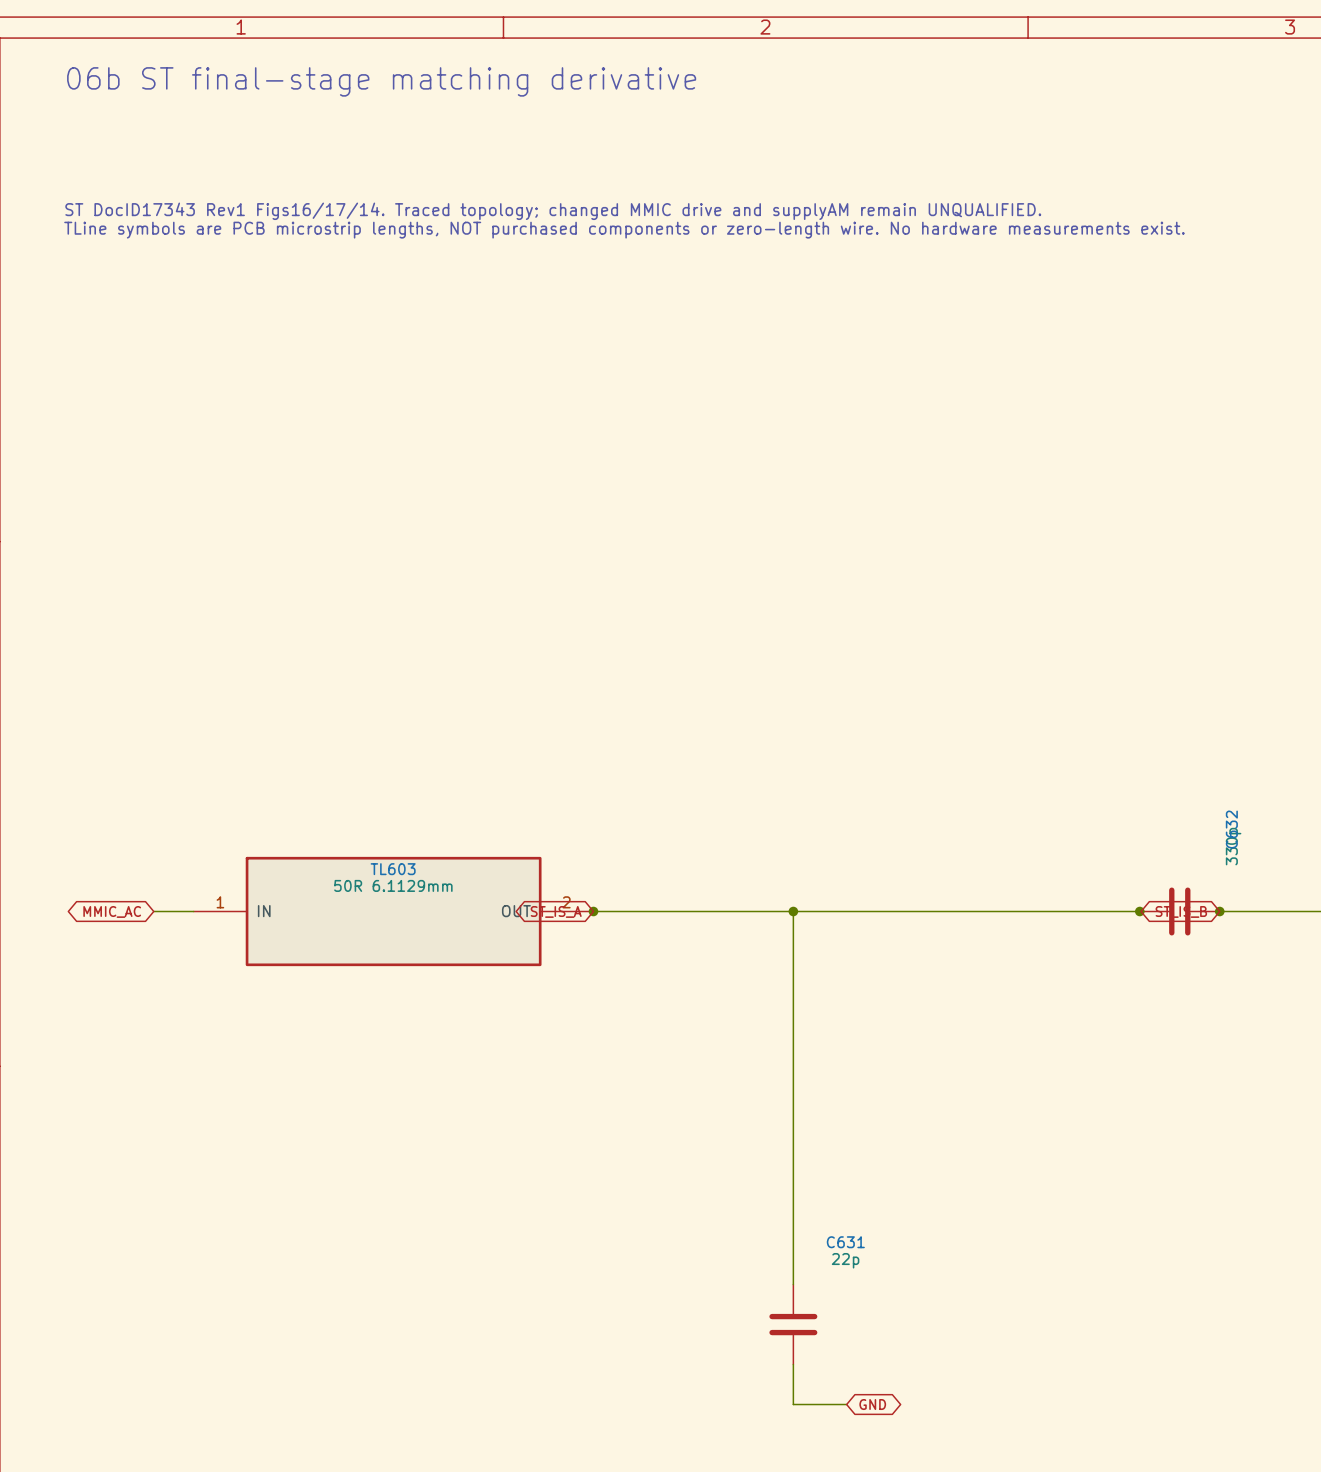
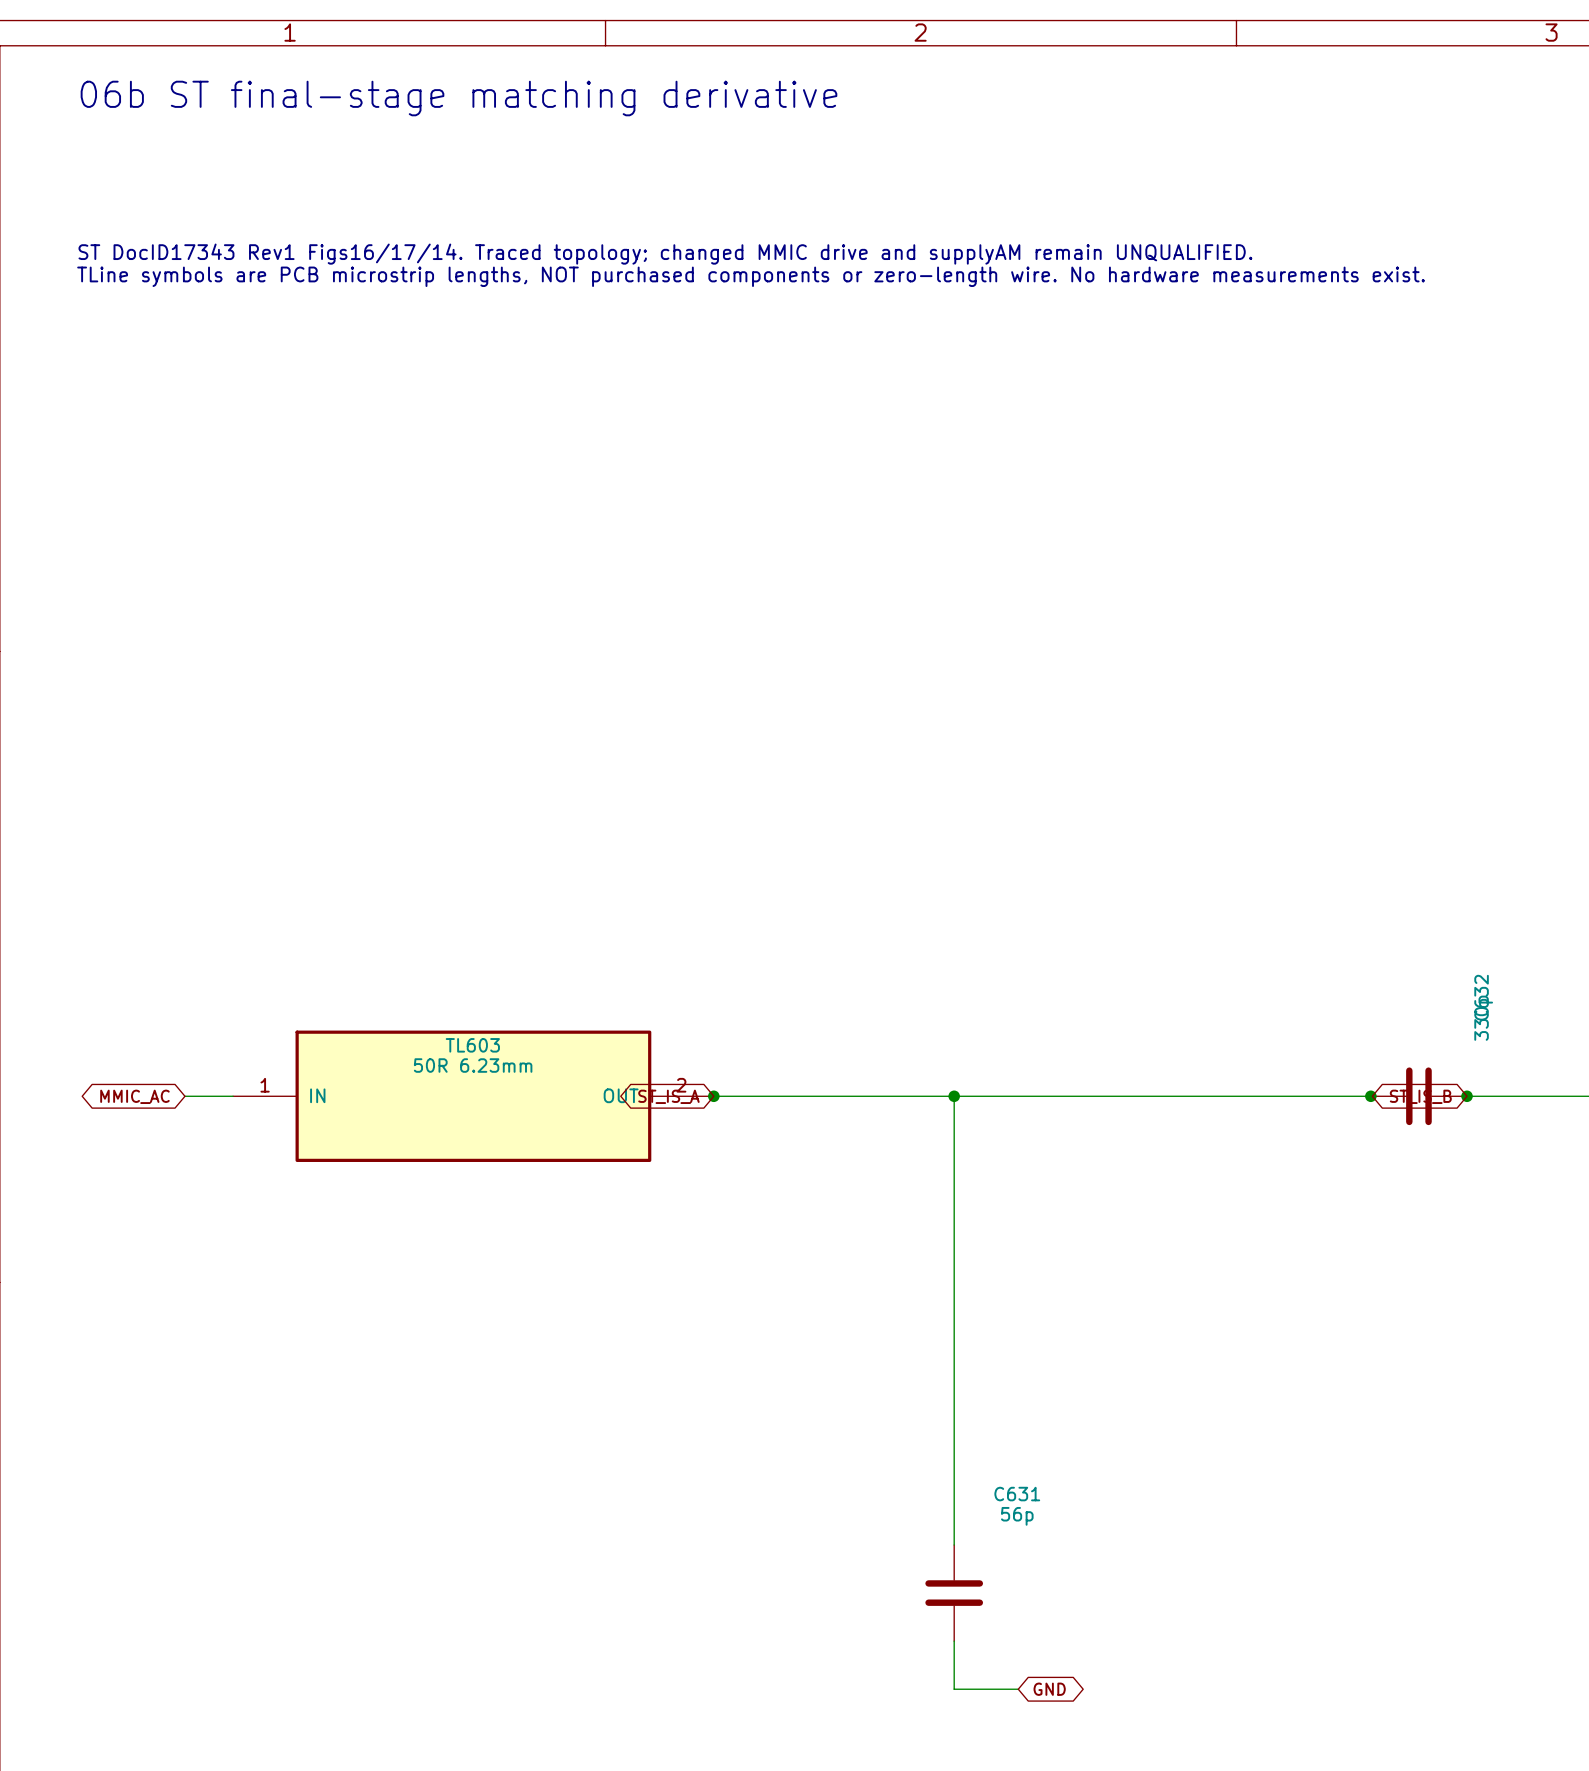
TL603 value: 50R 6.1129mm (393, 885) -> 50R 6.23mm (473, 1065)
C631 value: 22p (845, 1260) -> 56p (1017, 1516)

